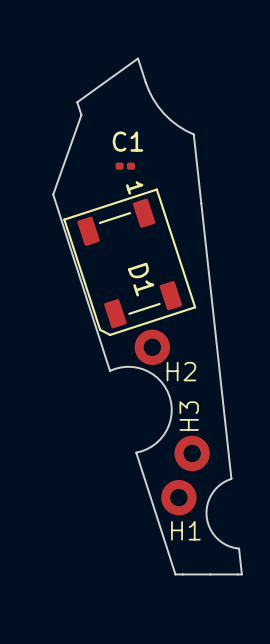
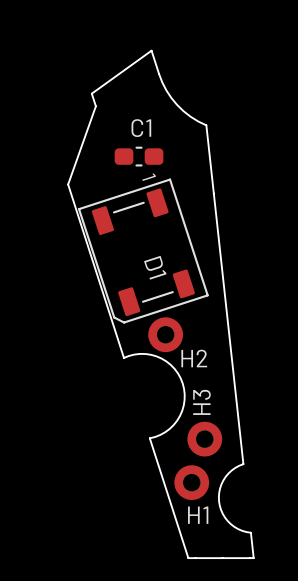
C1 footprint: [115, 162, 136, 170] -> [114, 146, 164, 167]

